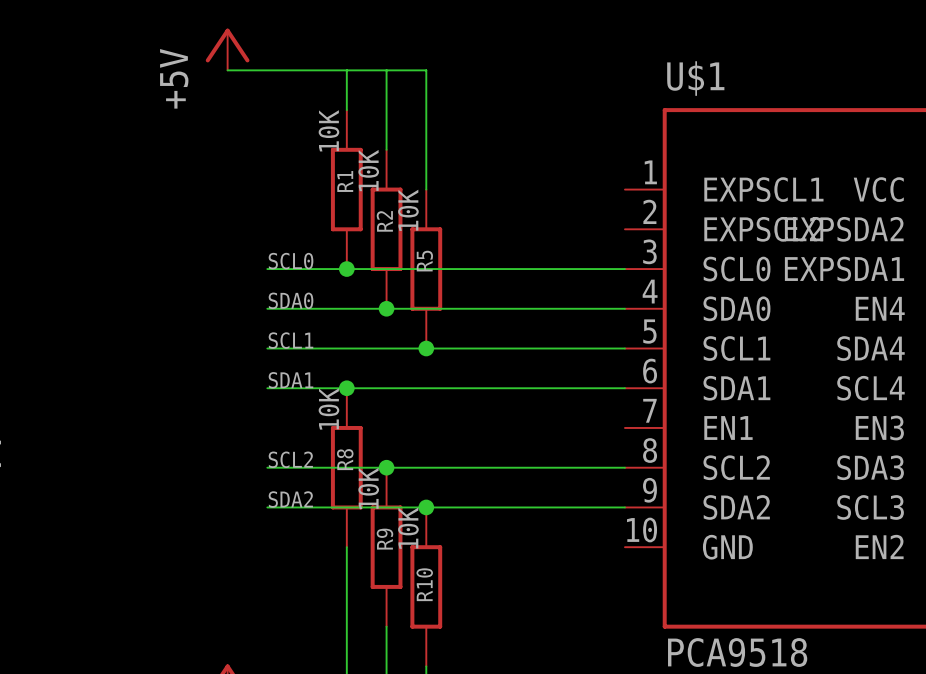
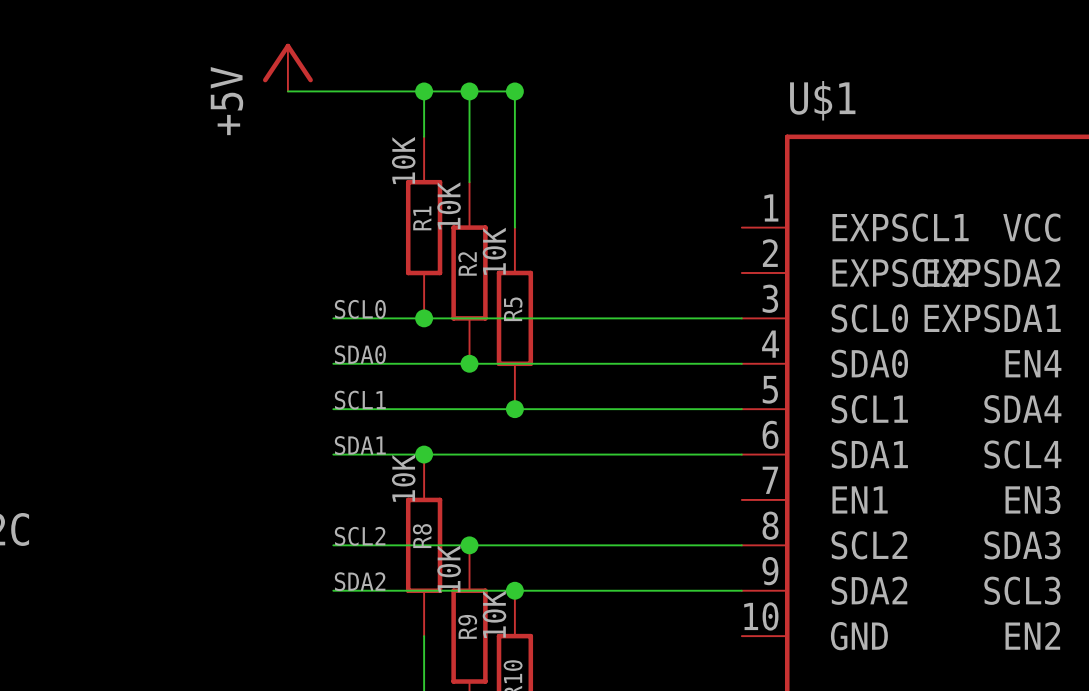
junction: none -> (424, 91)
junction: none -> (469, 91)
junction: none -> (514, 91)

